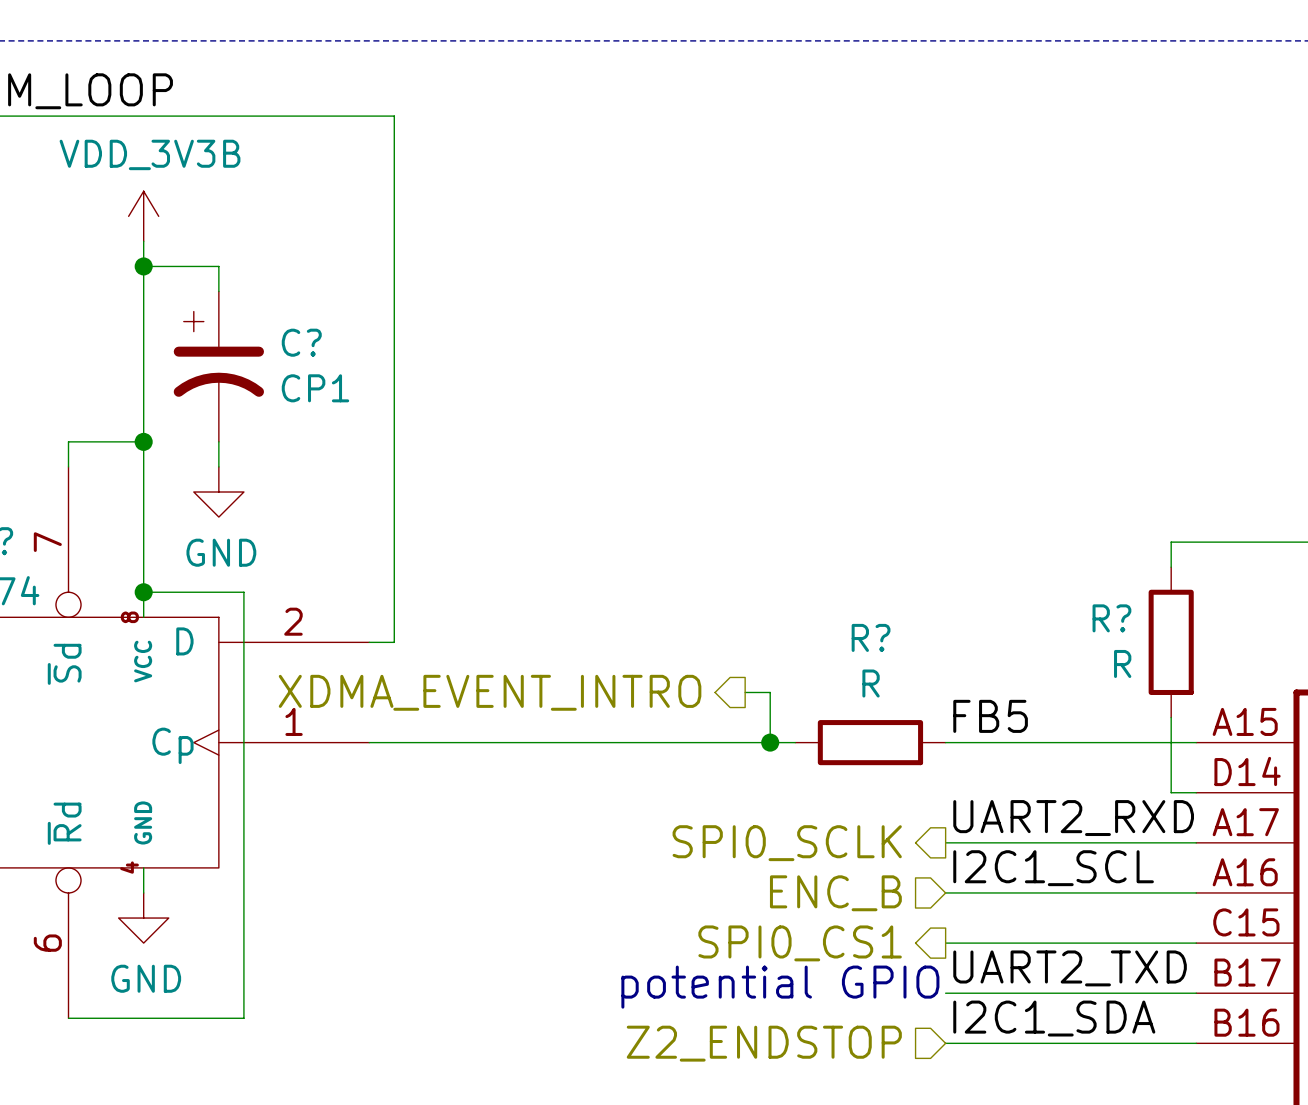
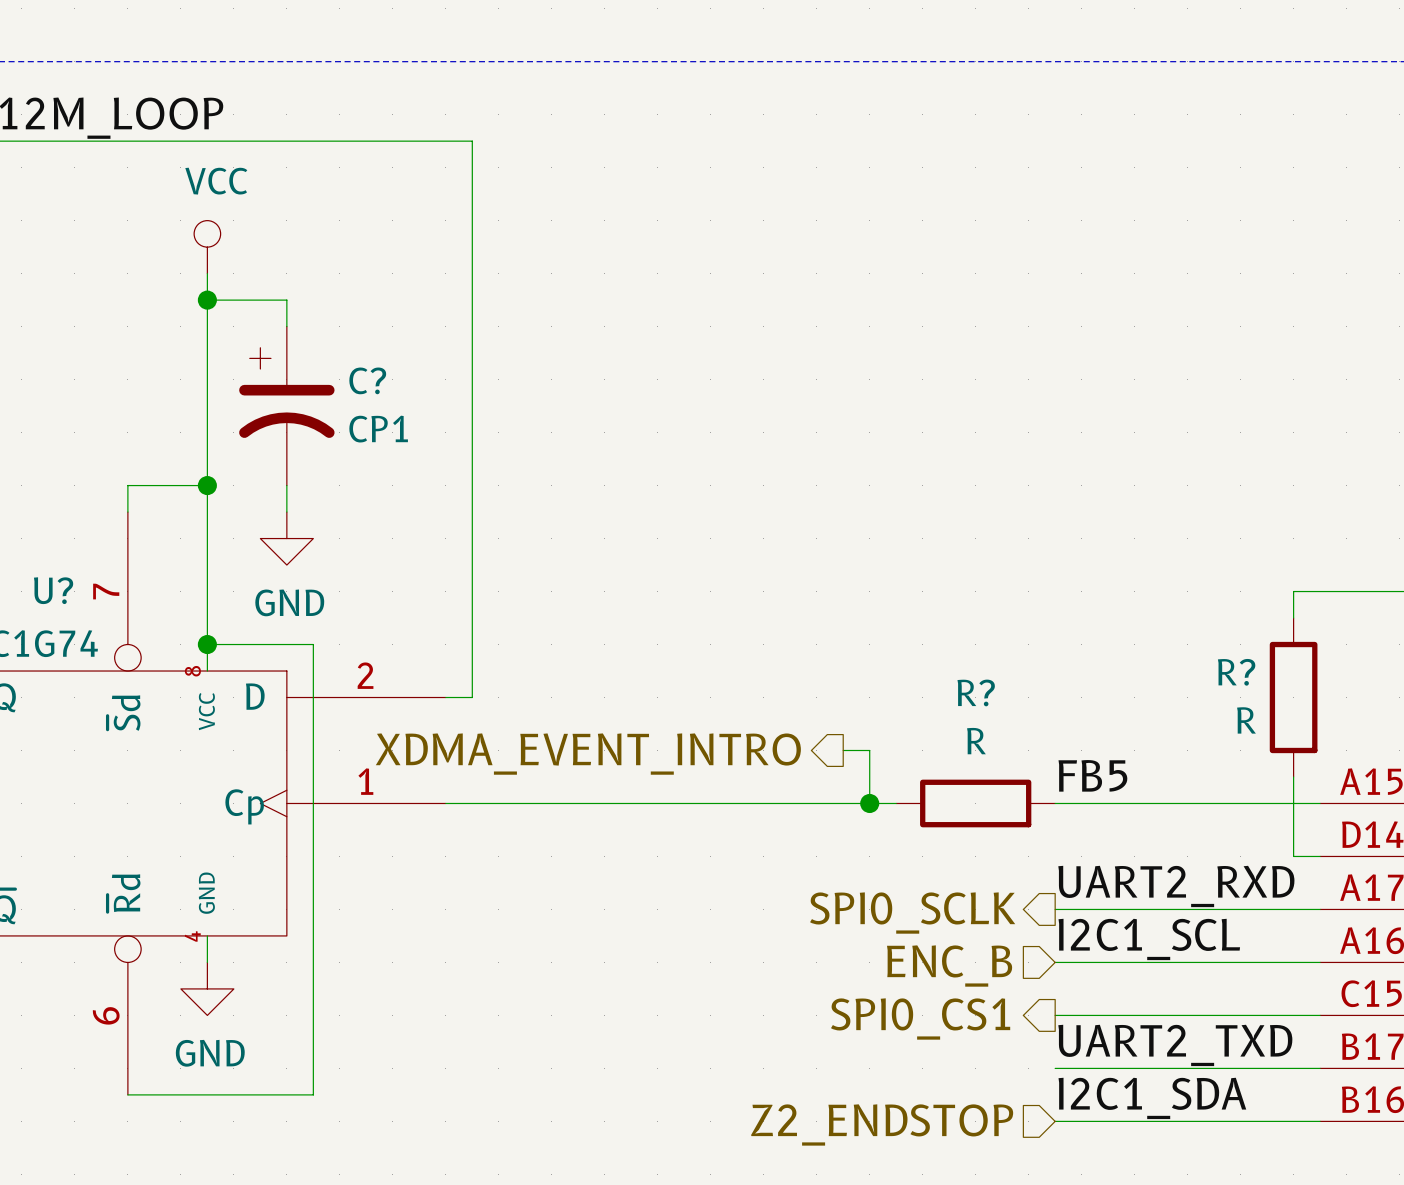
power symbol: VDD_3V3B (143, 216) -> VCC (207, 247)
text: potential GPIO (780, 987) -> none

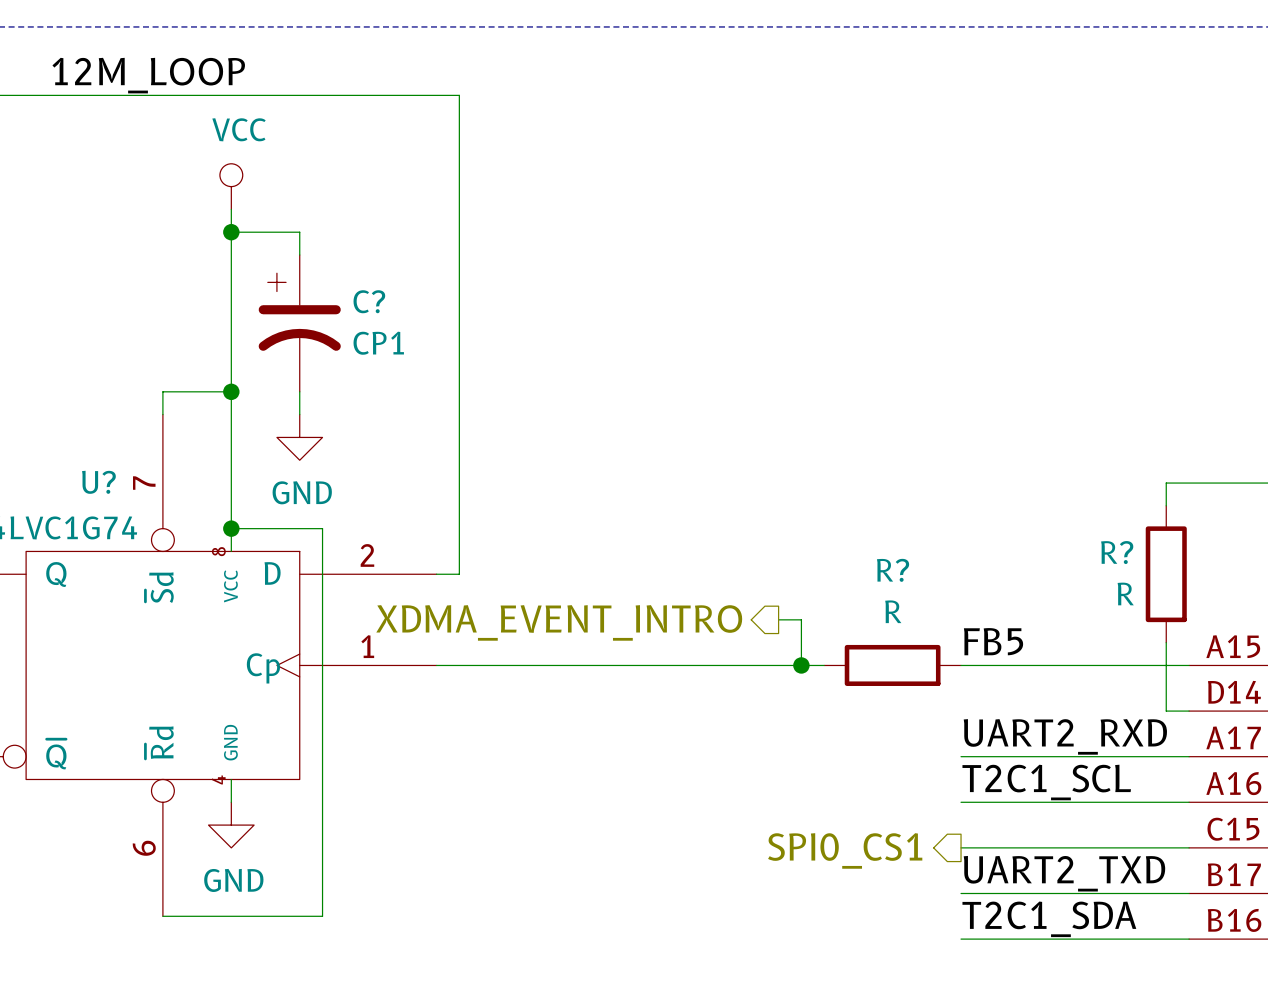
hierarchical label: SPI0_SCLK (912, 913) -> none
label: I2C1_SCL (1149, 939) -> T2C1_SCL (1046, 782)
hierarchical label: ENC_B (949, 966) -> none
label: I2C1_SDA (1152, 1098) -> T2C1_SDA (1049, 919)
hierarchical label: Z2_ENDSTOP (882, 1124) -> none

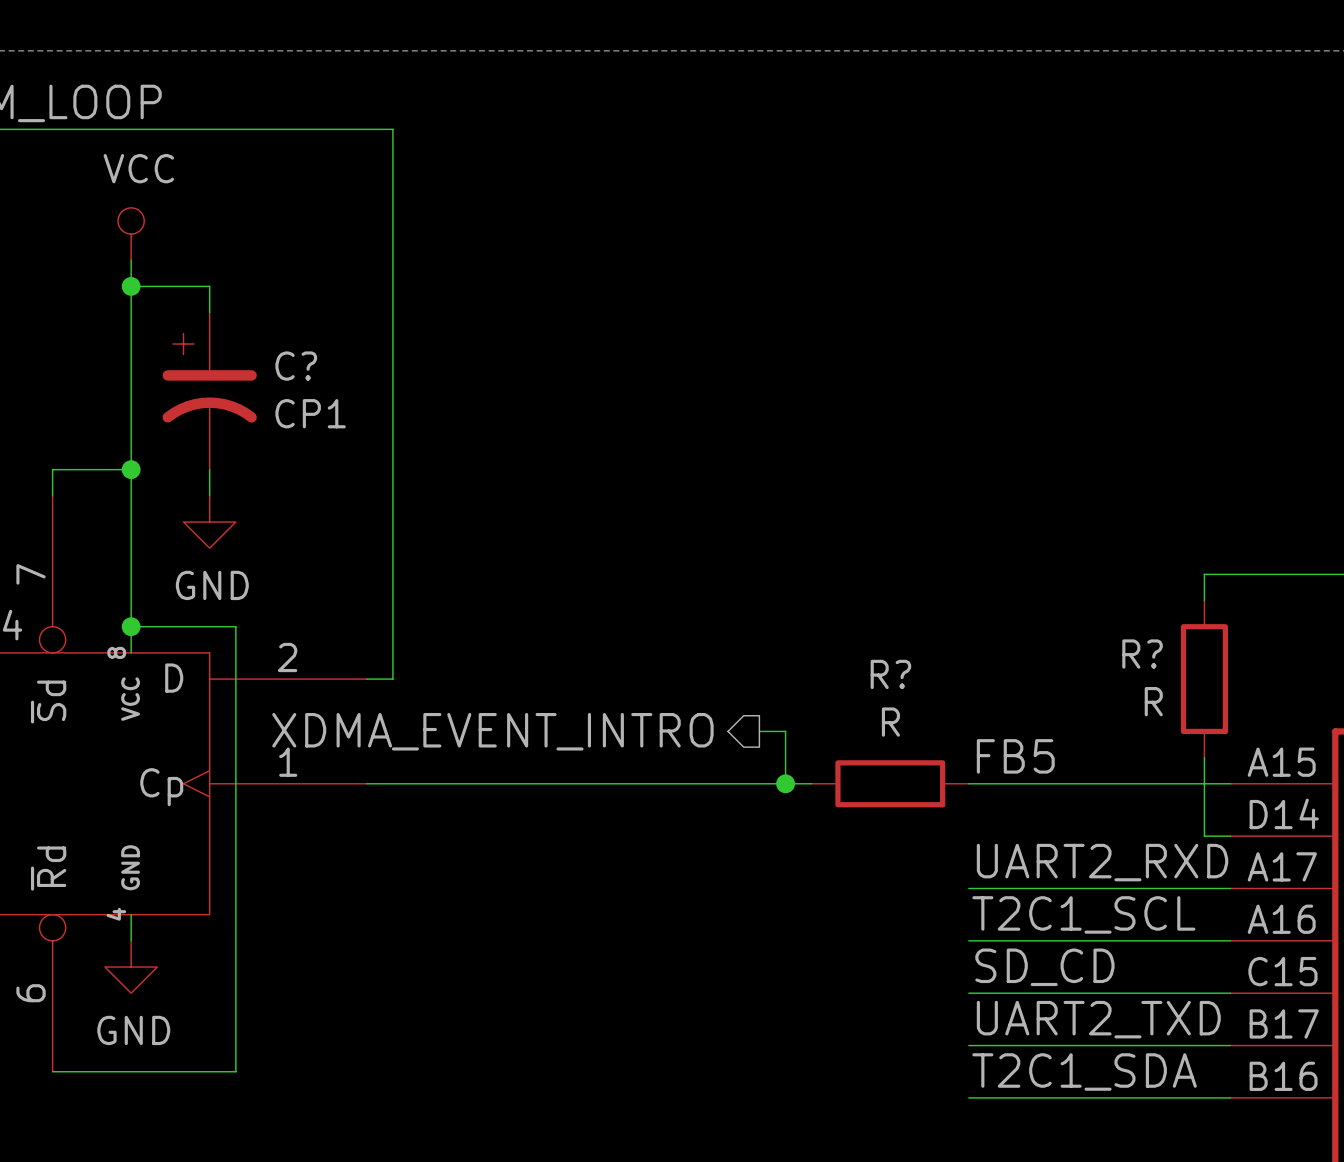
label: none -> SD_CD (1044, 967)
hierarchical label: SPI0_CS1 (845, 850) -> none

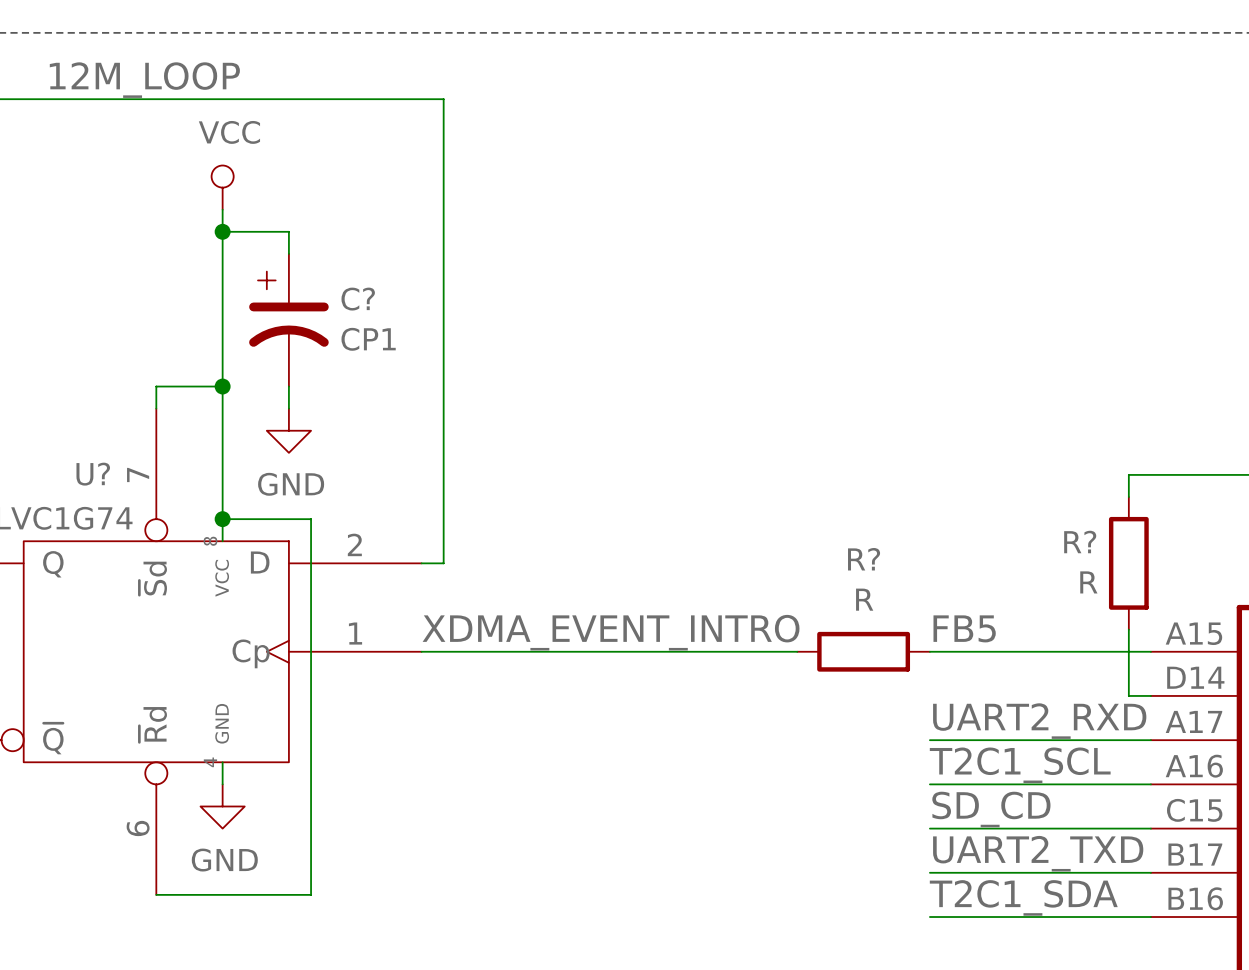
hierarchical label: XDMA_EVENT_INTRO (492, 731) -> none
wire: (759, 731) (785, 731) (785, 783) -> none
label: none -> XDMA_EVENT_INTRO (611, 632)
junction: (785, 783) -> none

